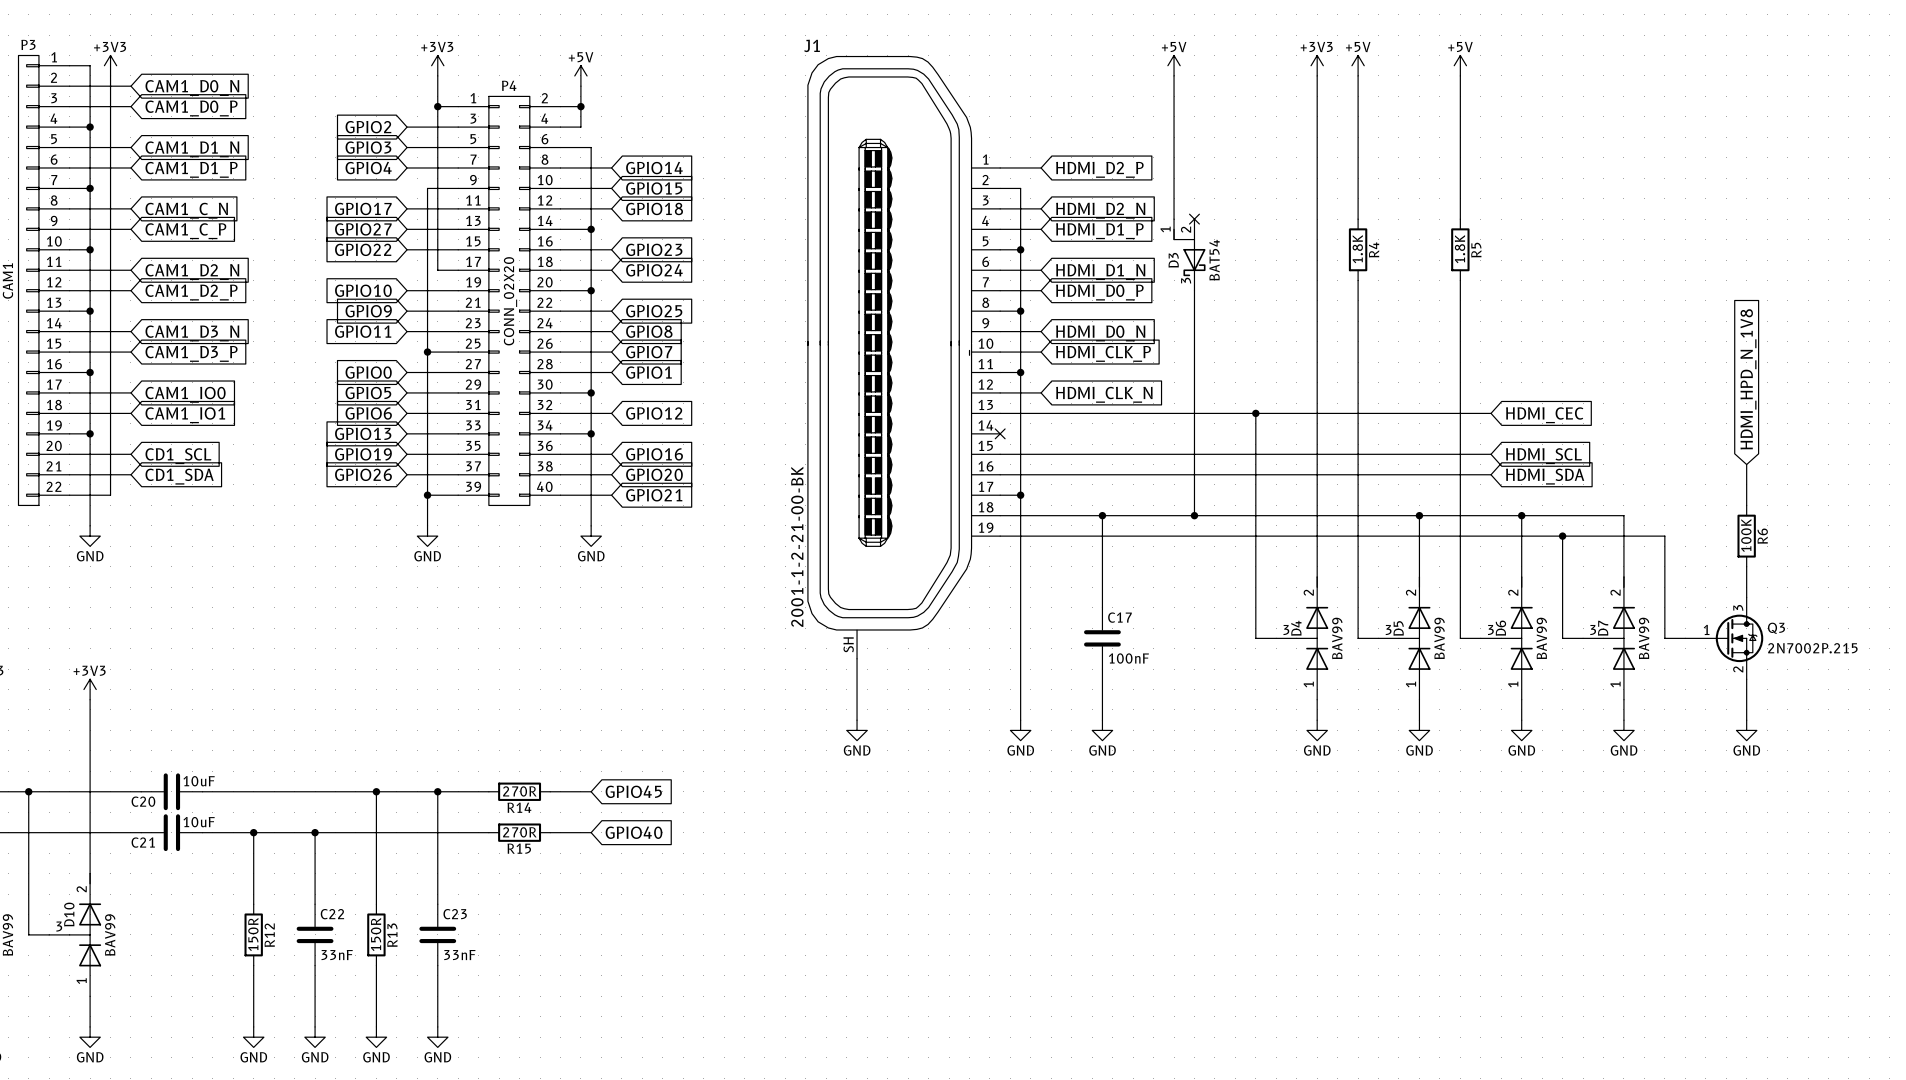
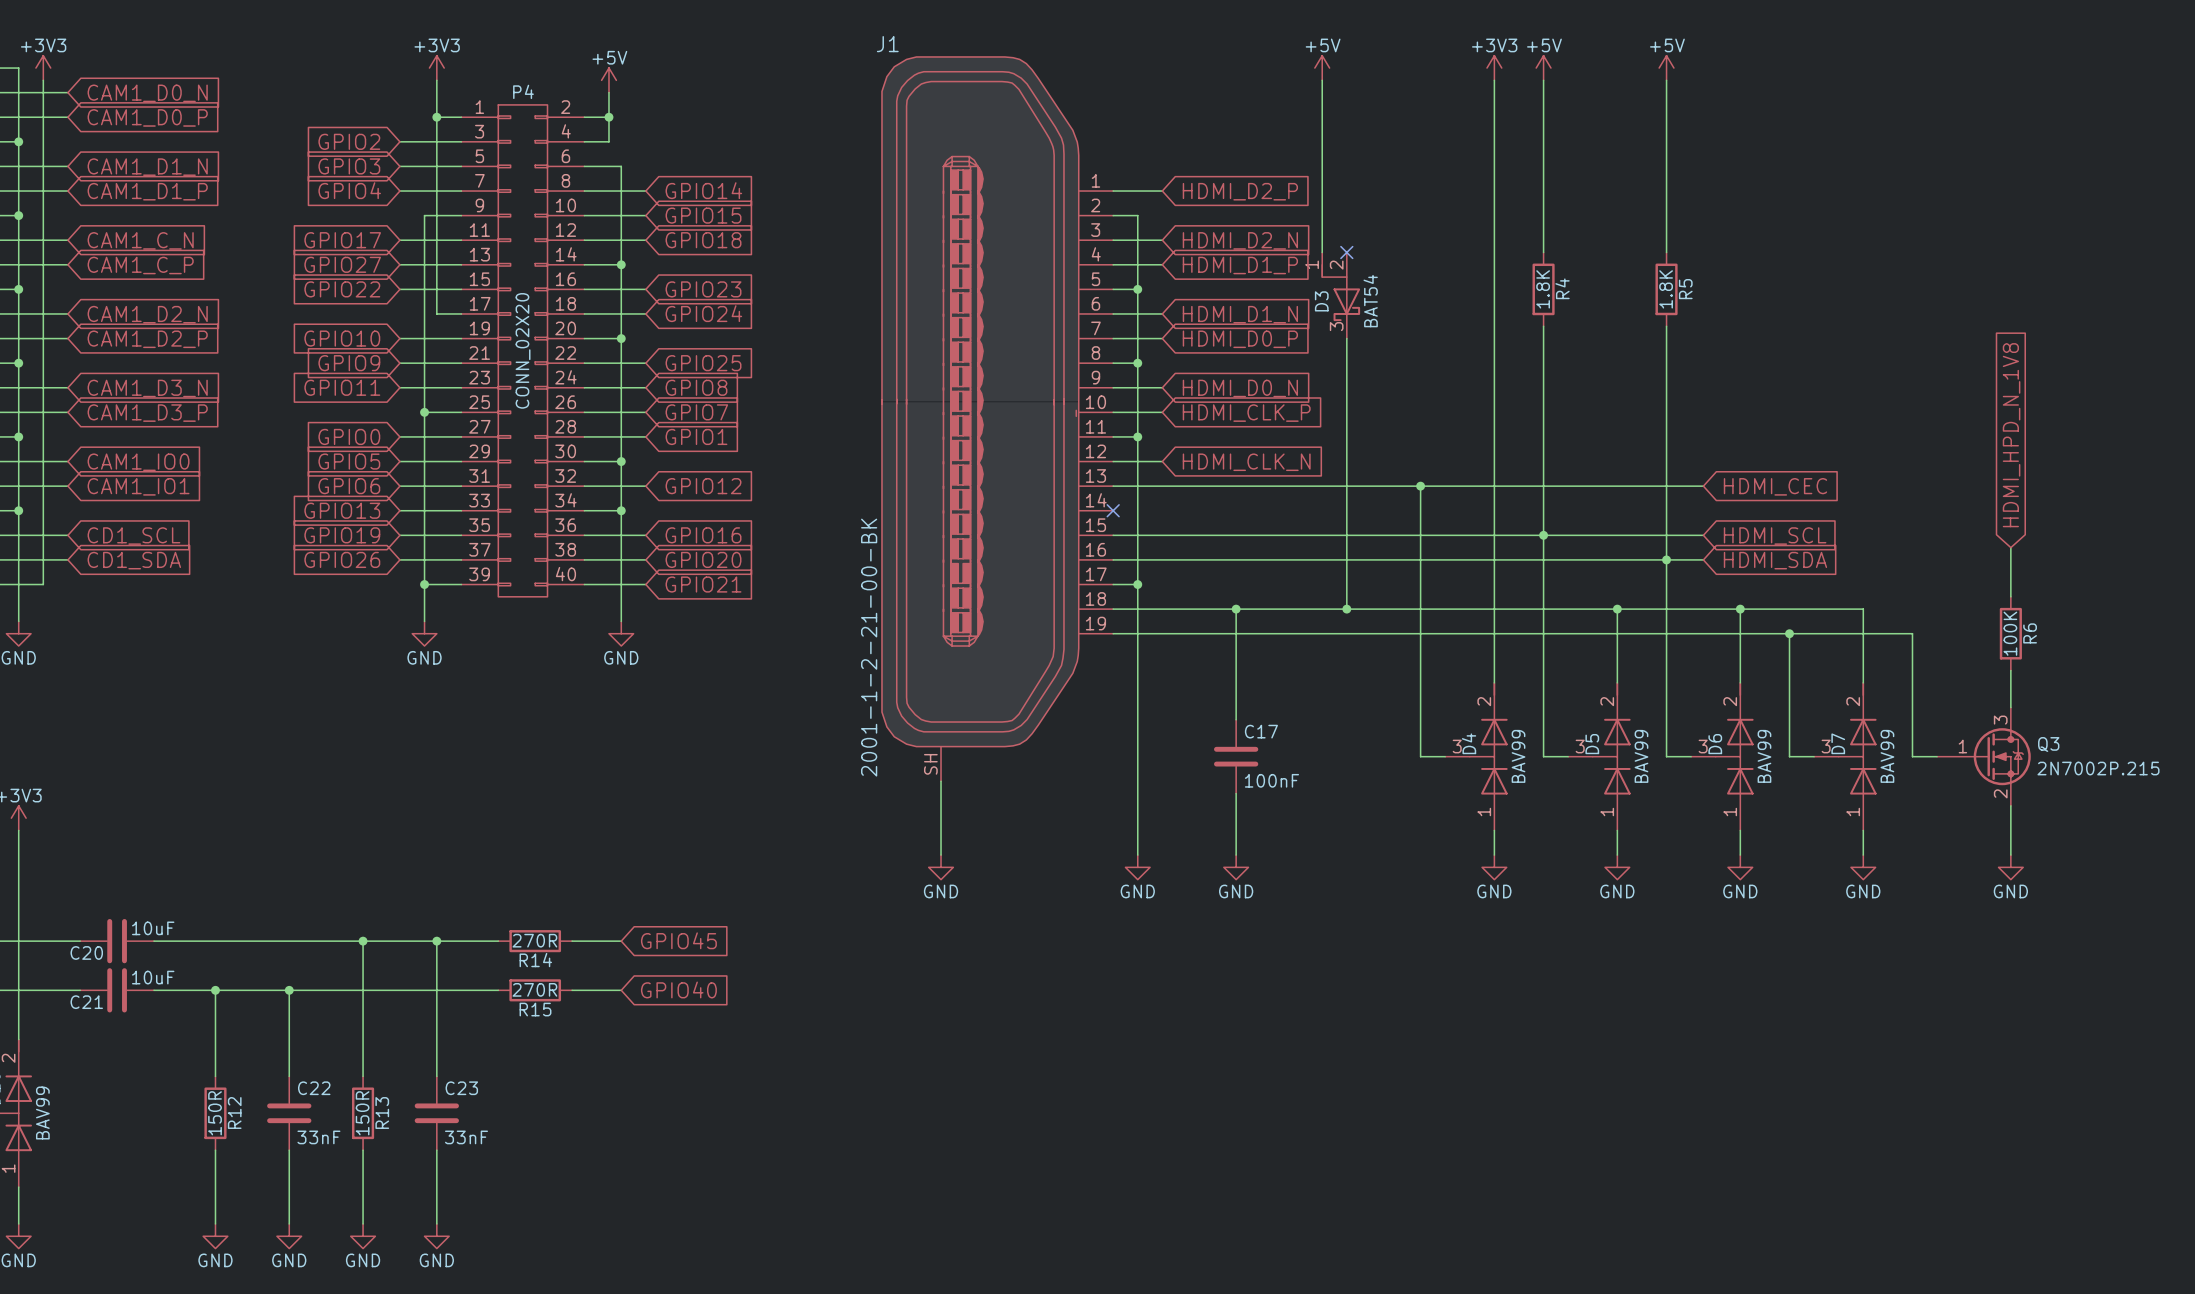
junction: none -> (1543, 535)
junction: none -> (1666, 559)

